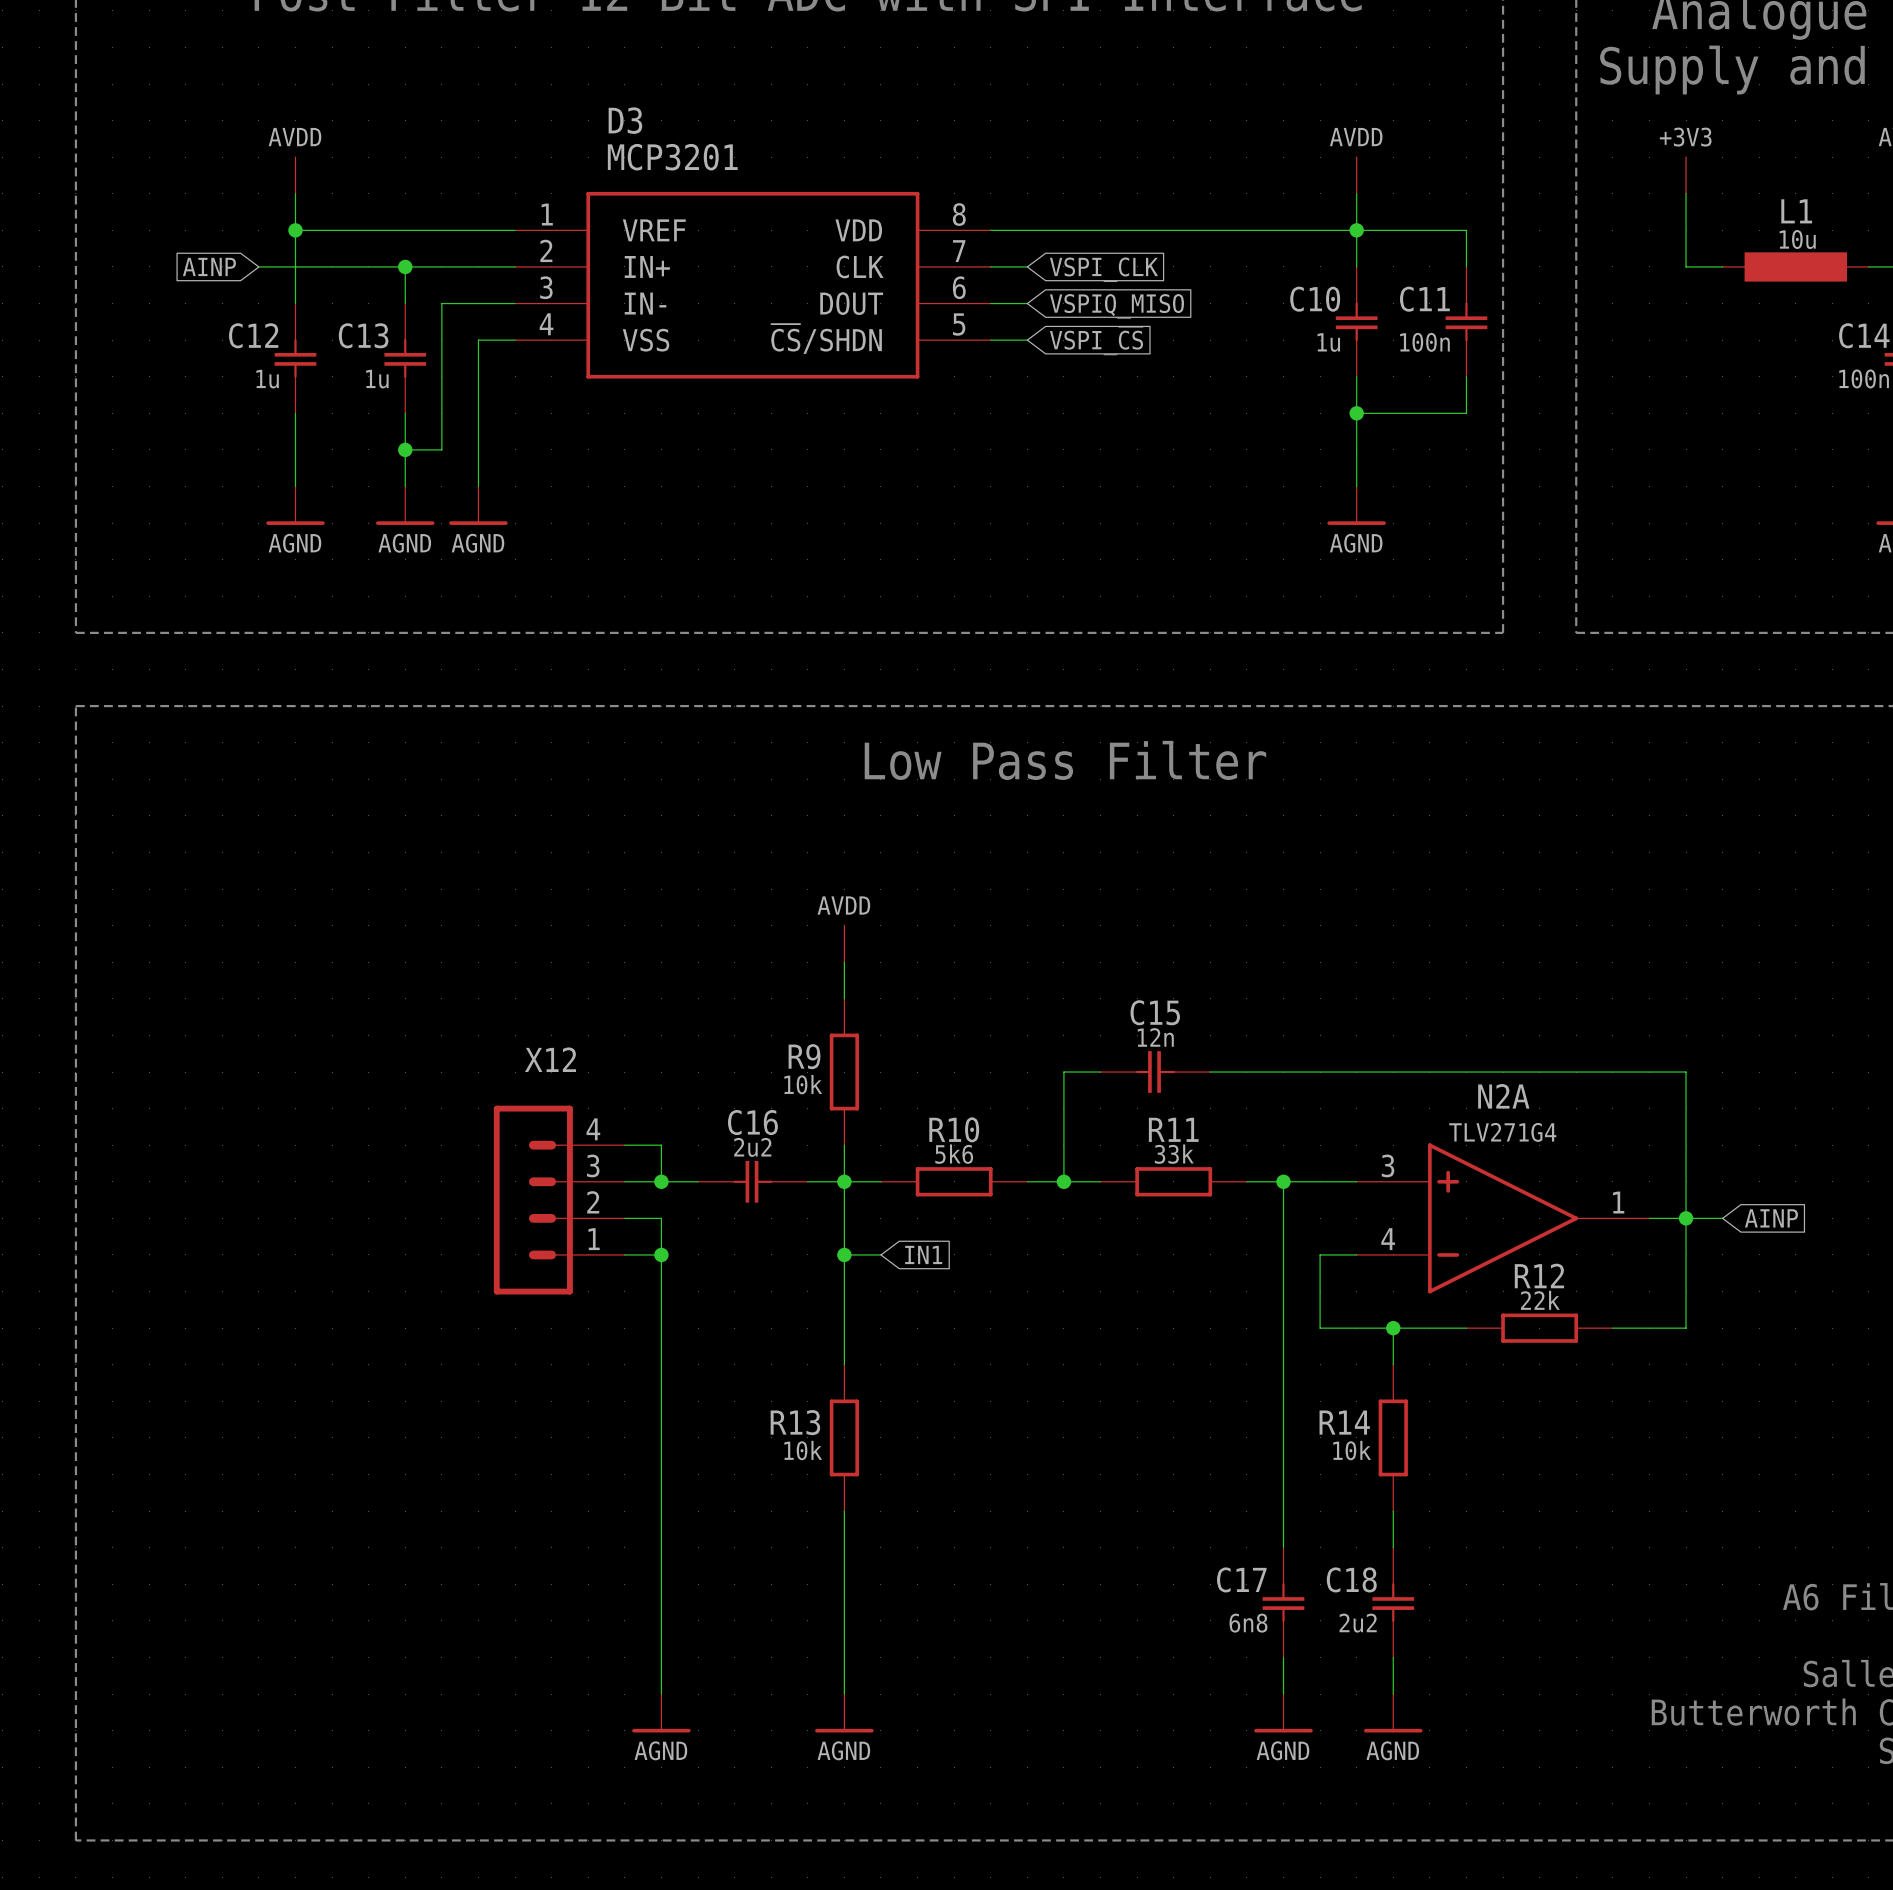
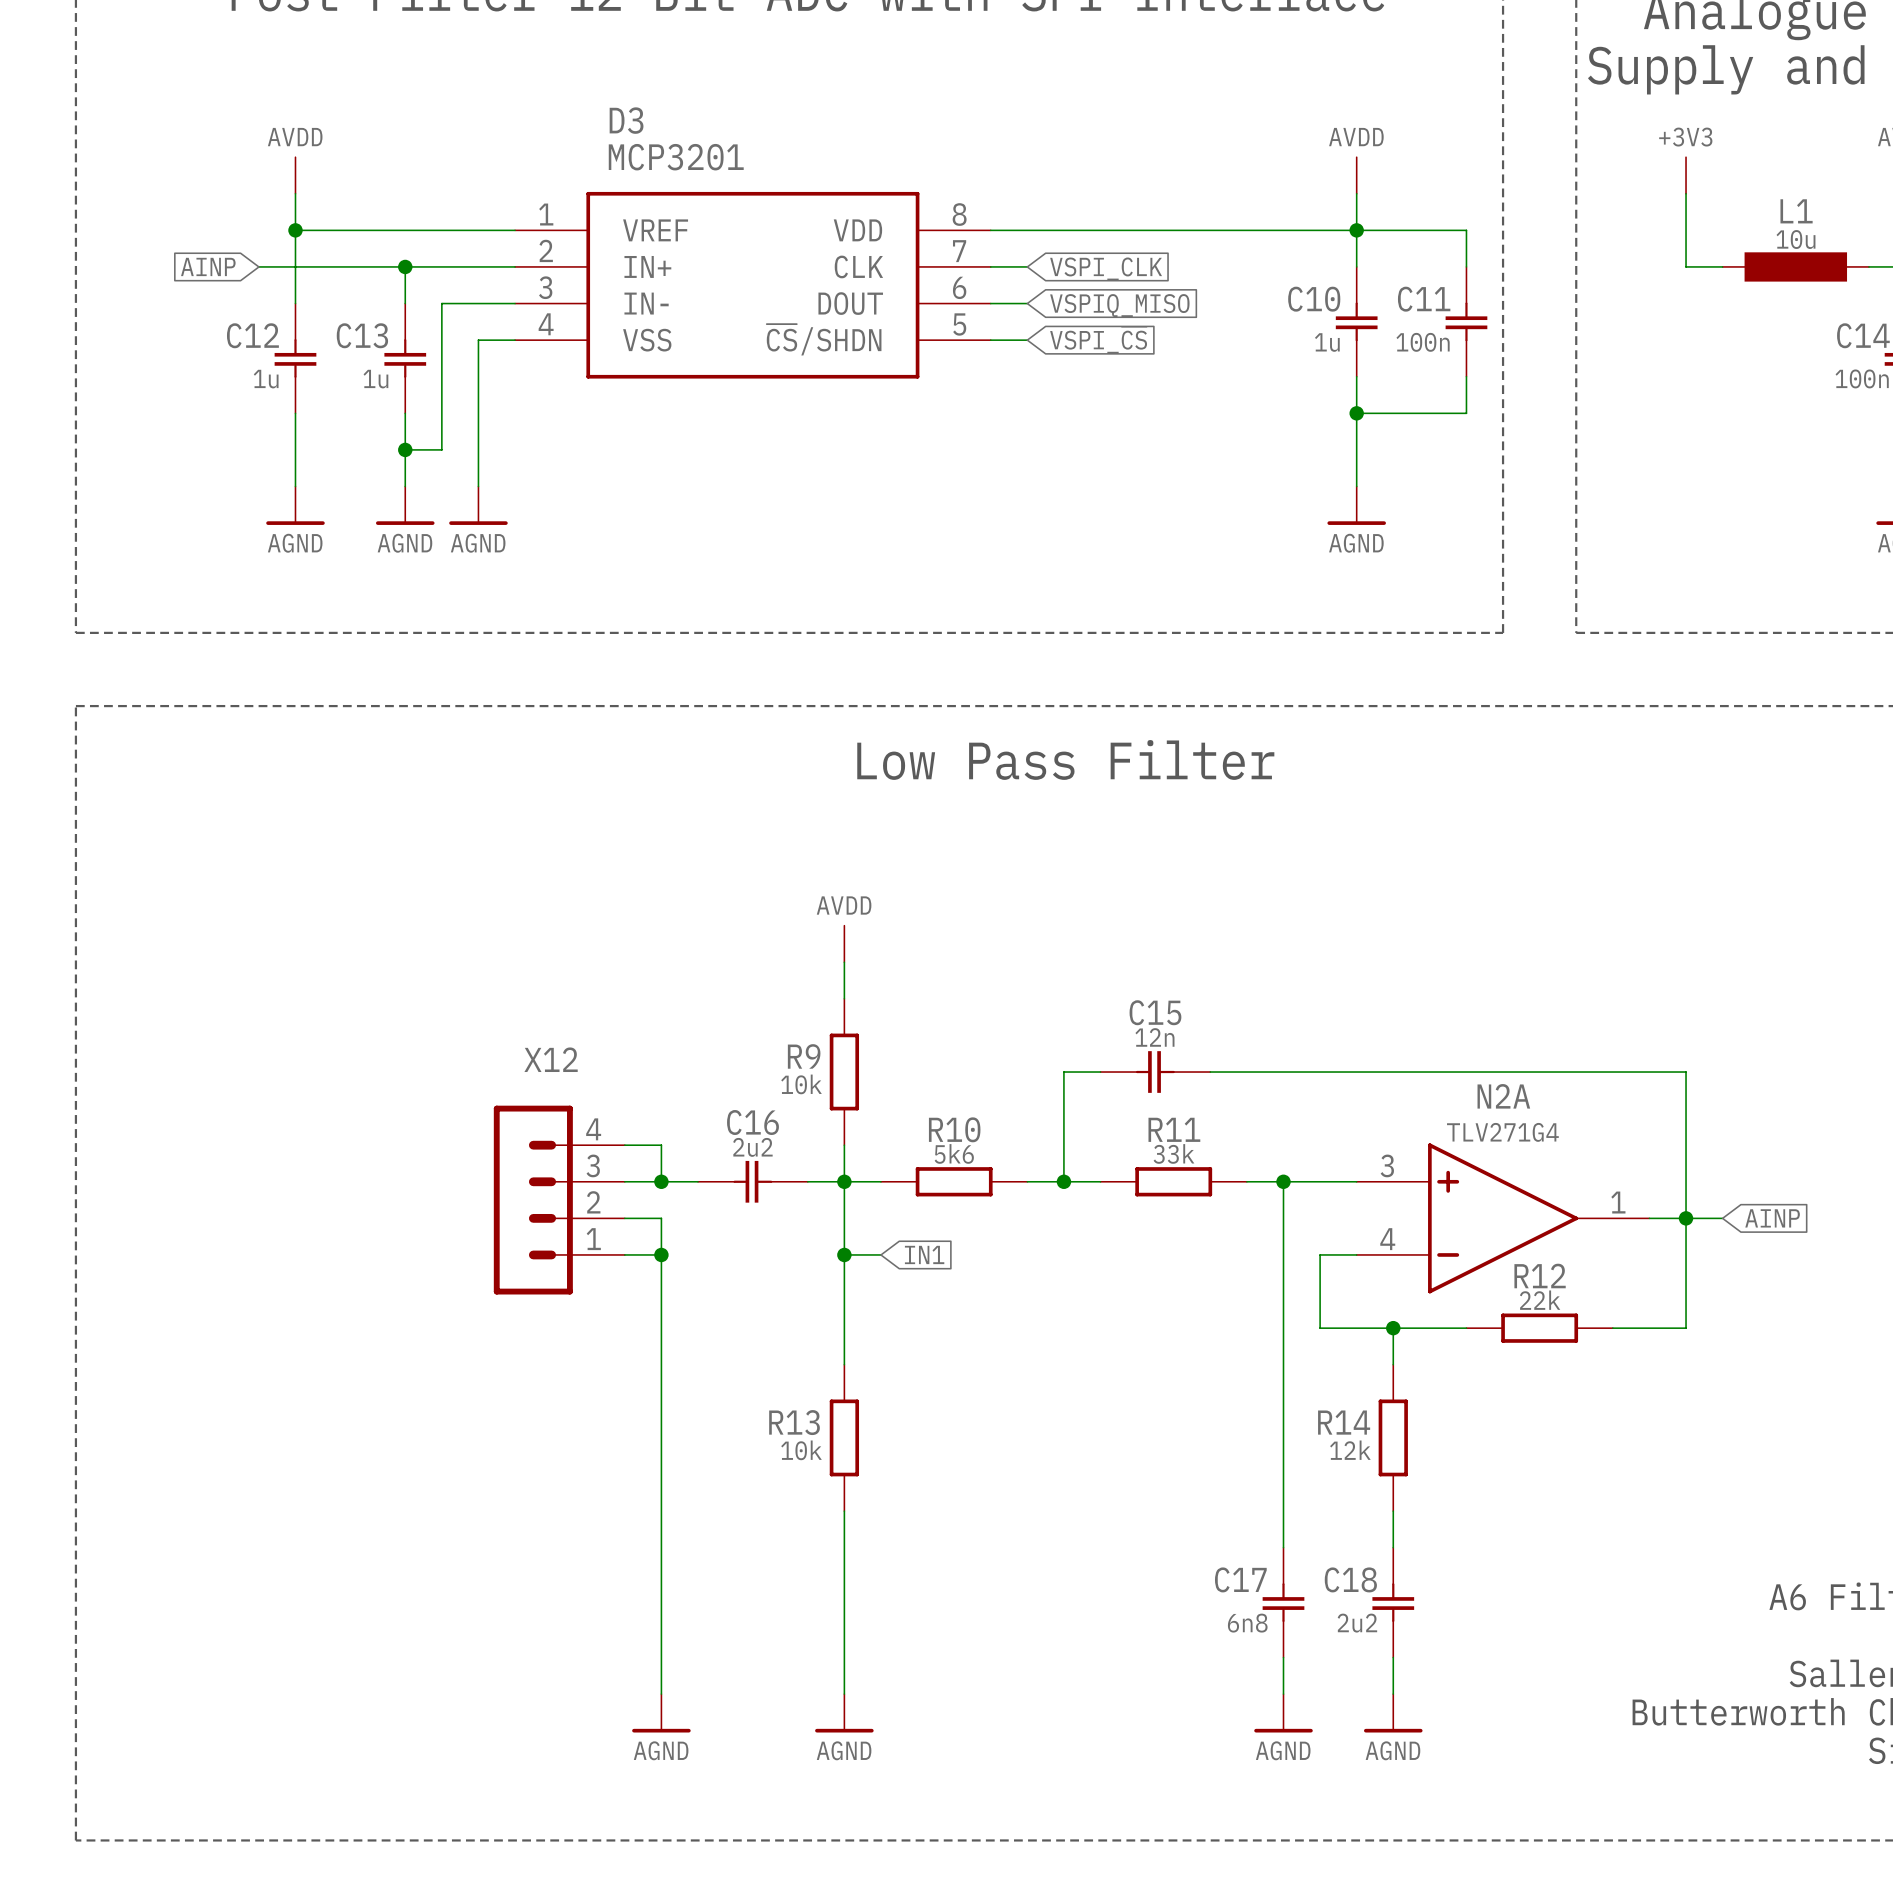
R14 value: 10k (1352, 1450) -> 12k (1350, 1450)

